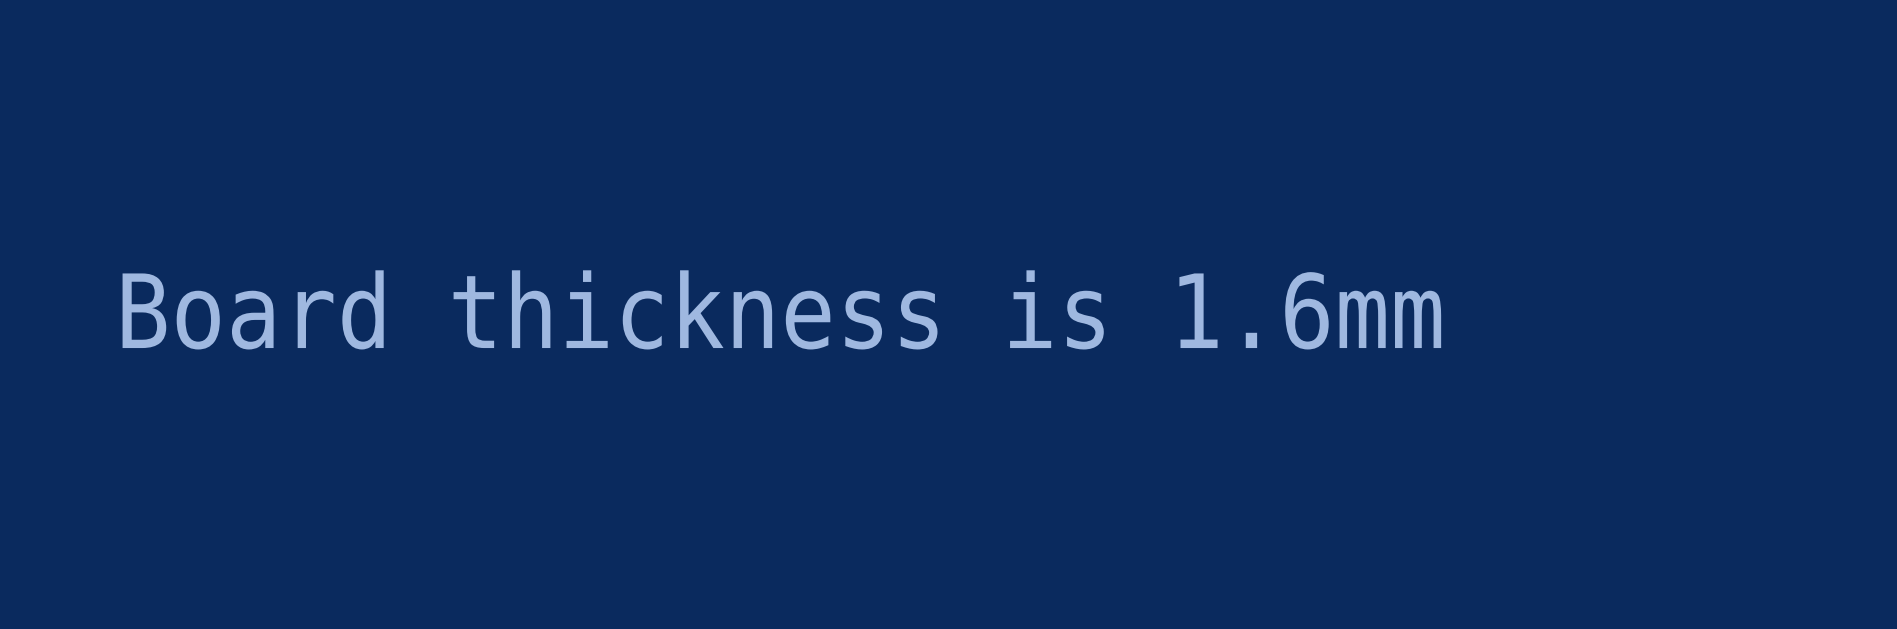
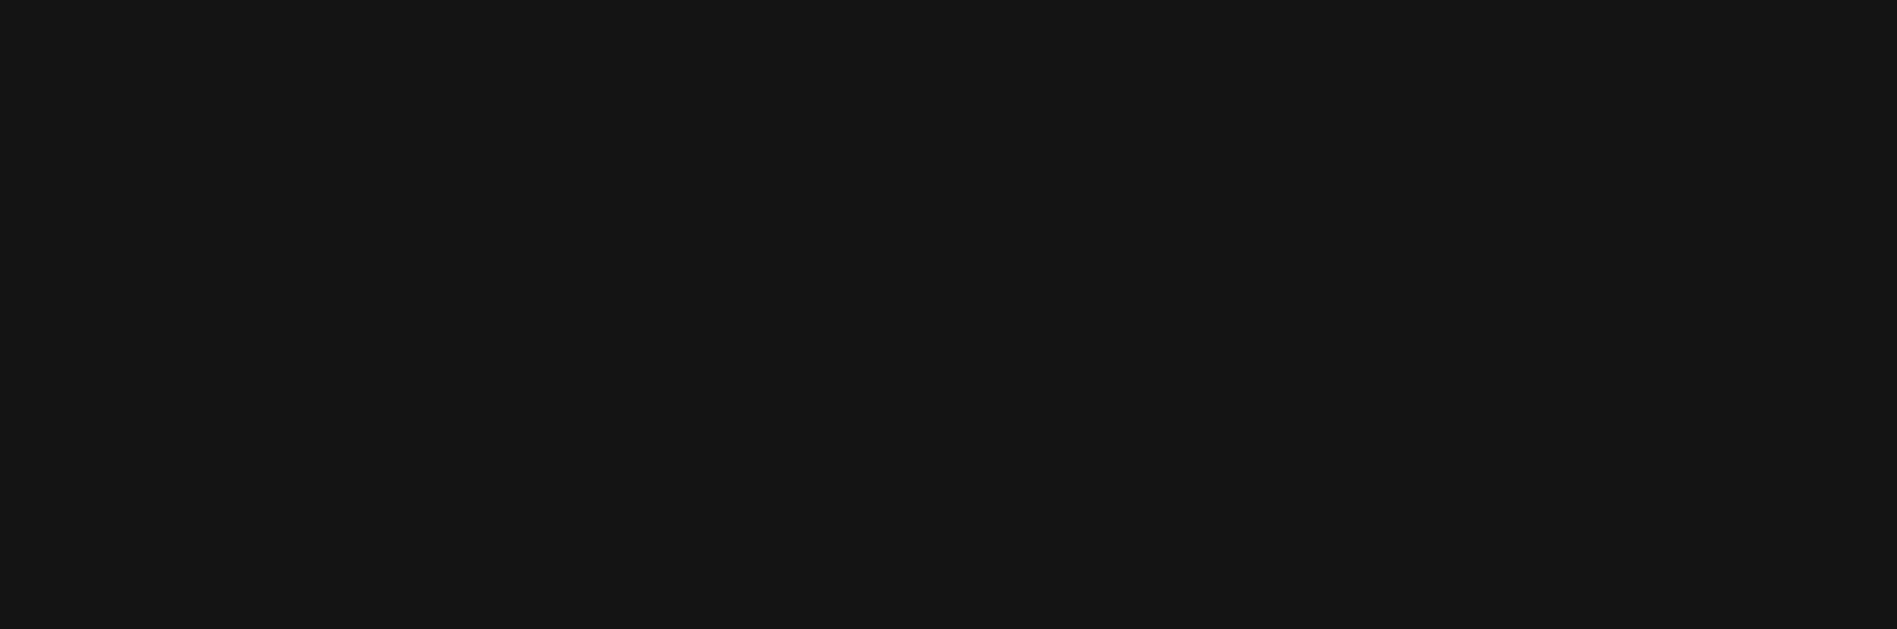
text: Board thickness is 1.6mm (781, 309) -> none

